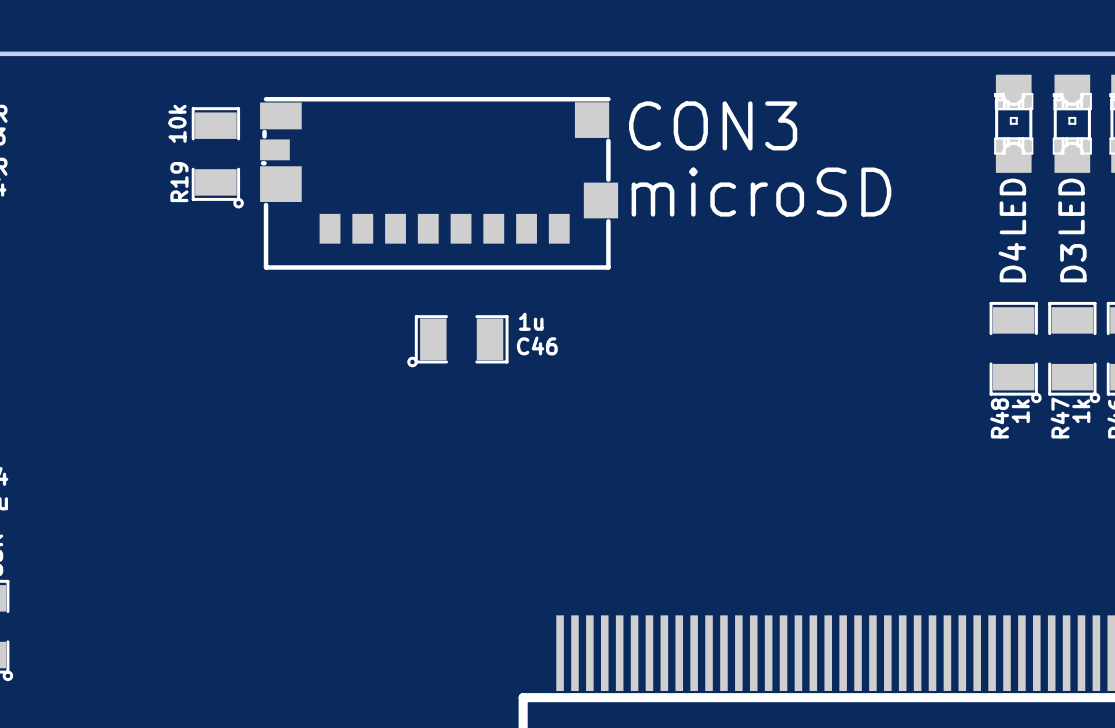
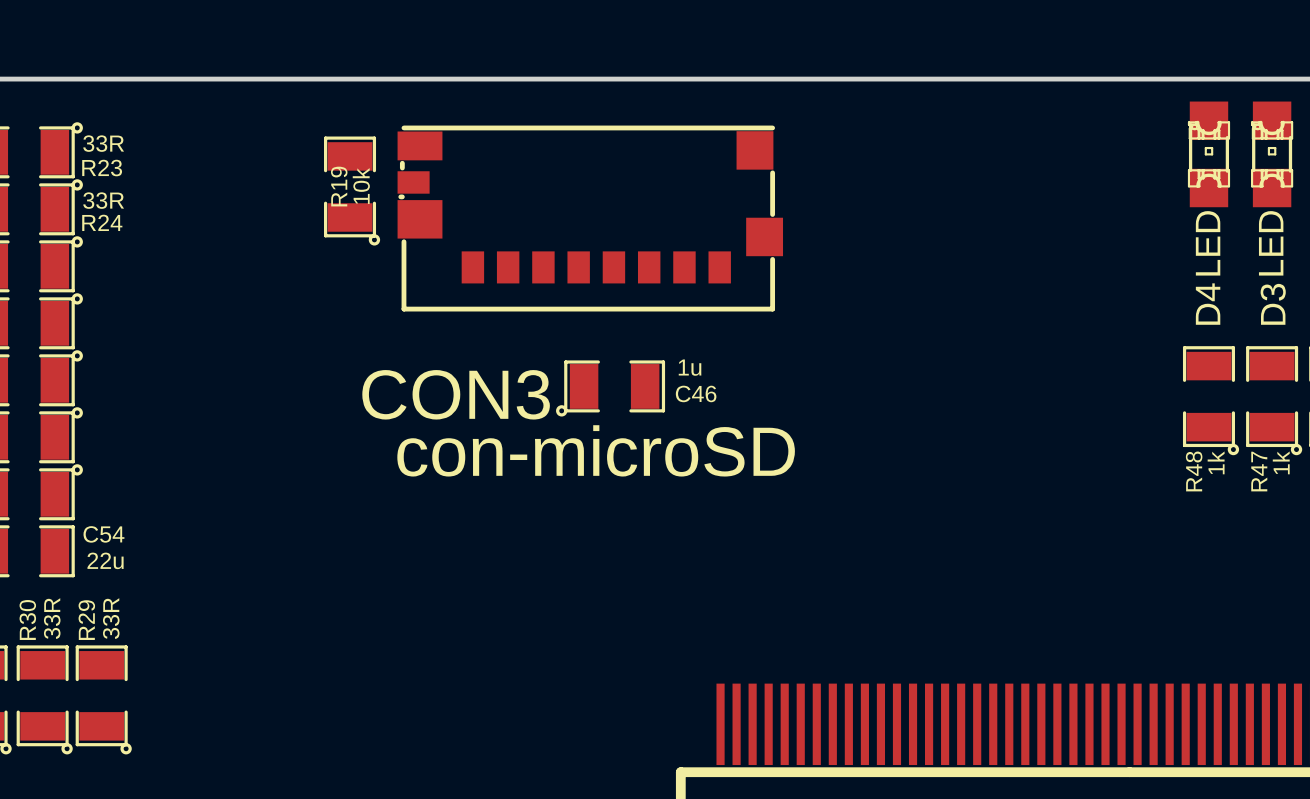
R19 value position: 10k (177, 123) -> 10k (361, 186)
CON3 name position: CON3 (713, 125) -> CON3 (456, 394)
R19 name position: R19 (179, 182) -> R19 (339, 186)
CON3 value: microSD (761, 192) -> con-microSD (596, 450)

